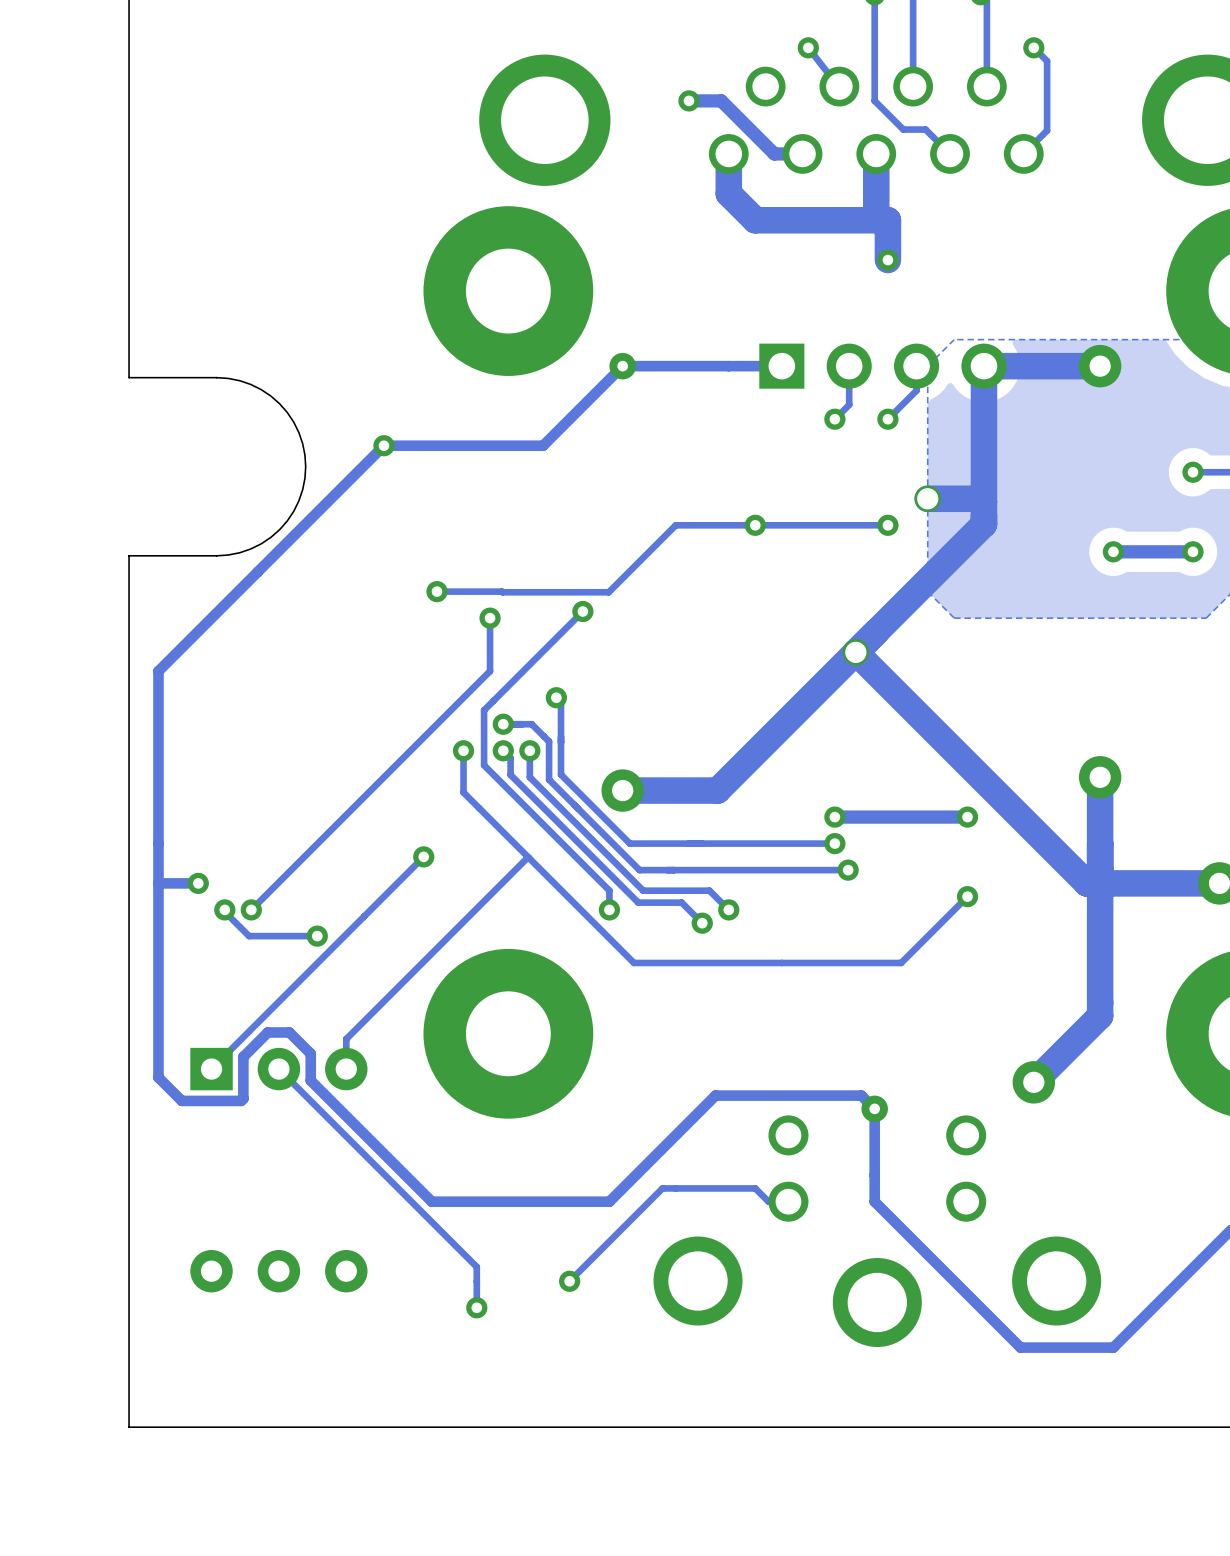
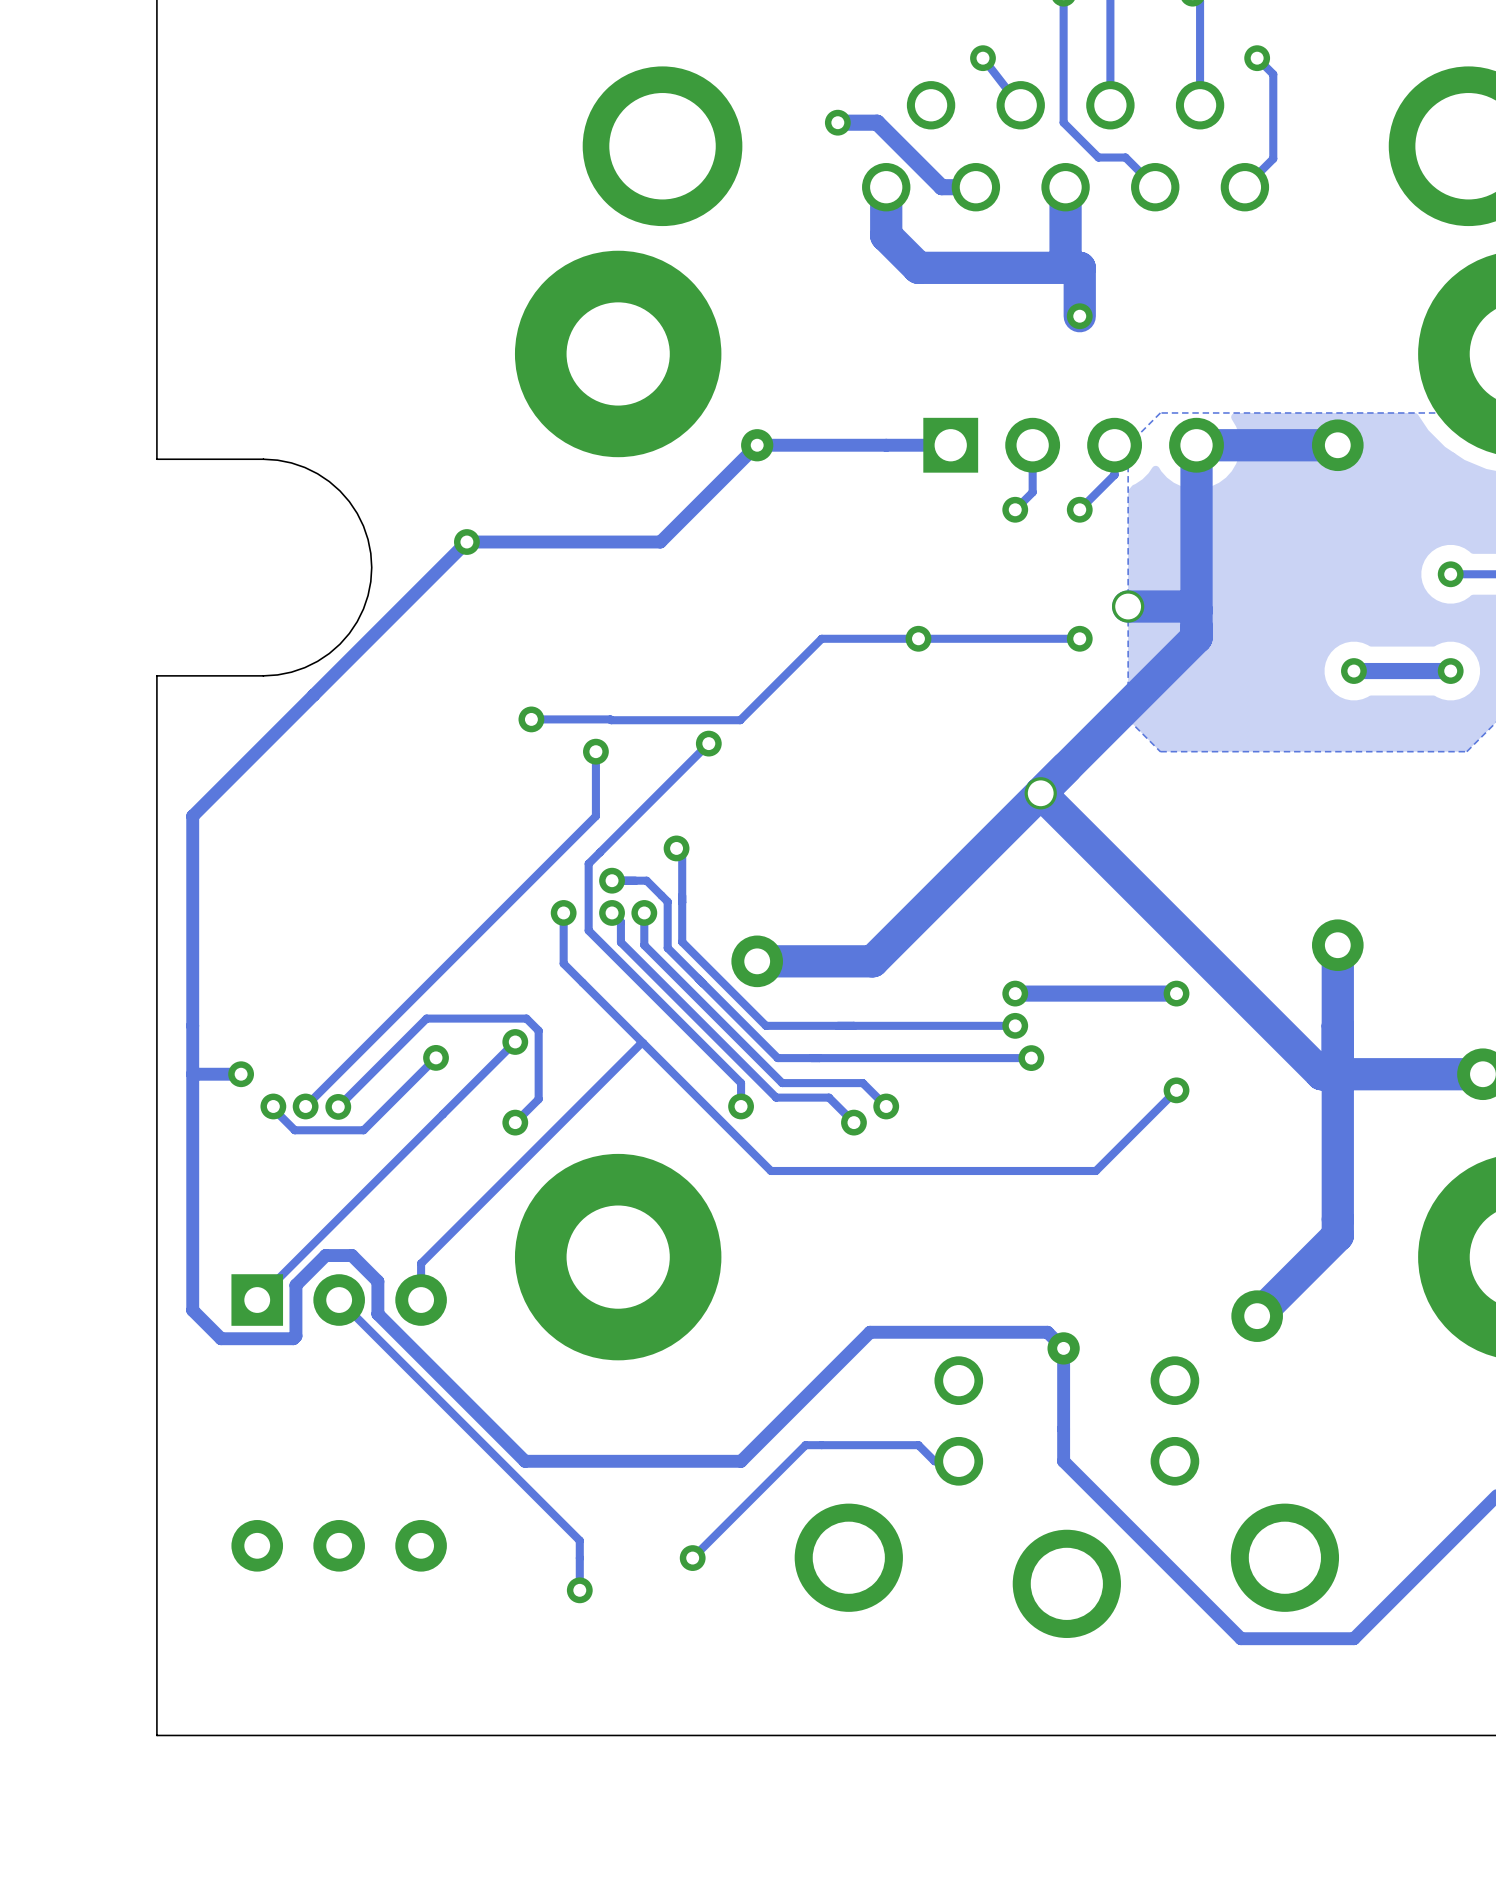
via: none -> (436, 1057)
track: none -> (338, 1106) (426, 1018) (526, 1018) (538, 1030) (538, 1099) (515, 1122)
via: none -> (338, 1106)
via: none -> (515, 1122)
track: (242, 929) (249, 936) (317, 936) -> (294, 1130) (363, 1130) (436, 1057)
via: (317, 936) -> none

